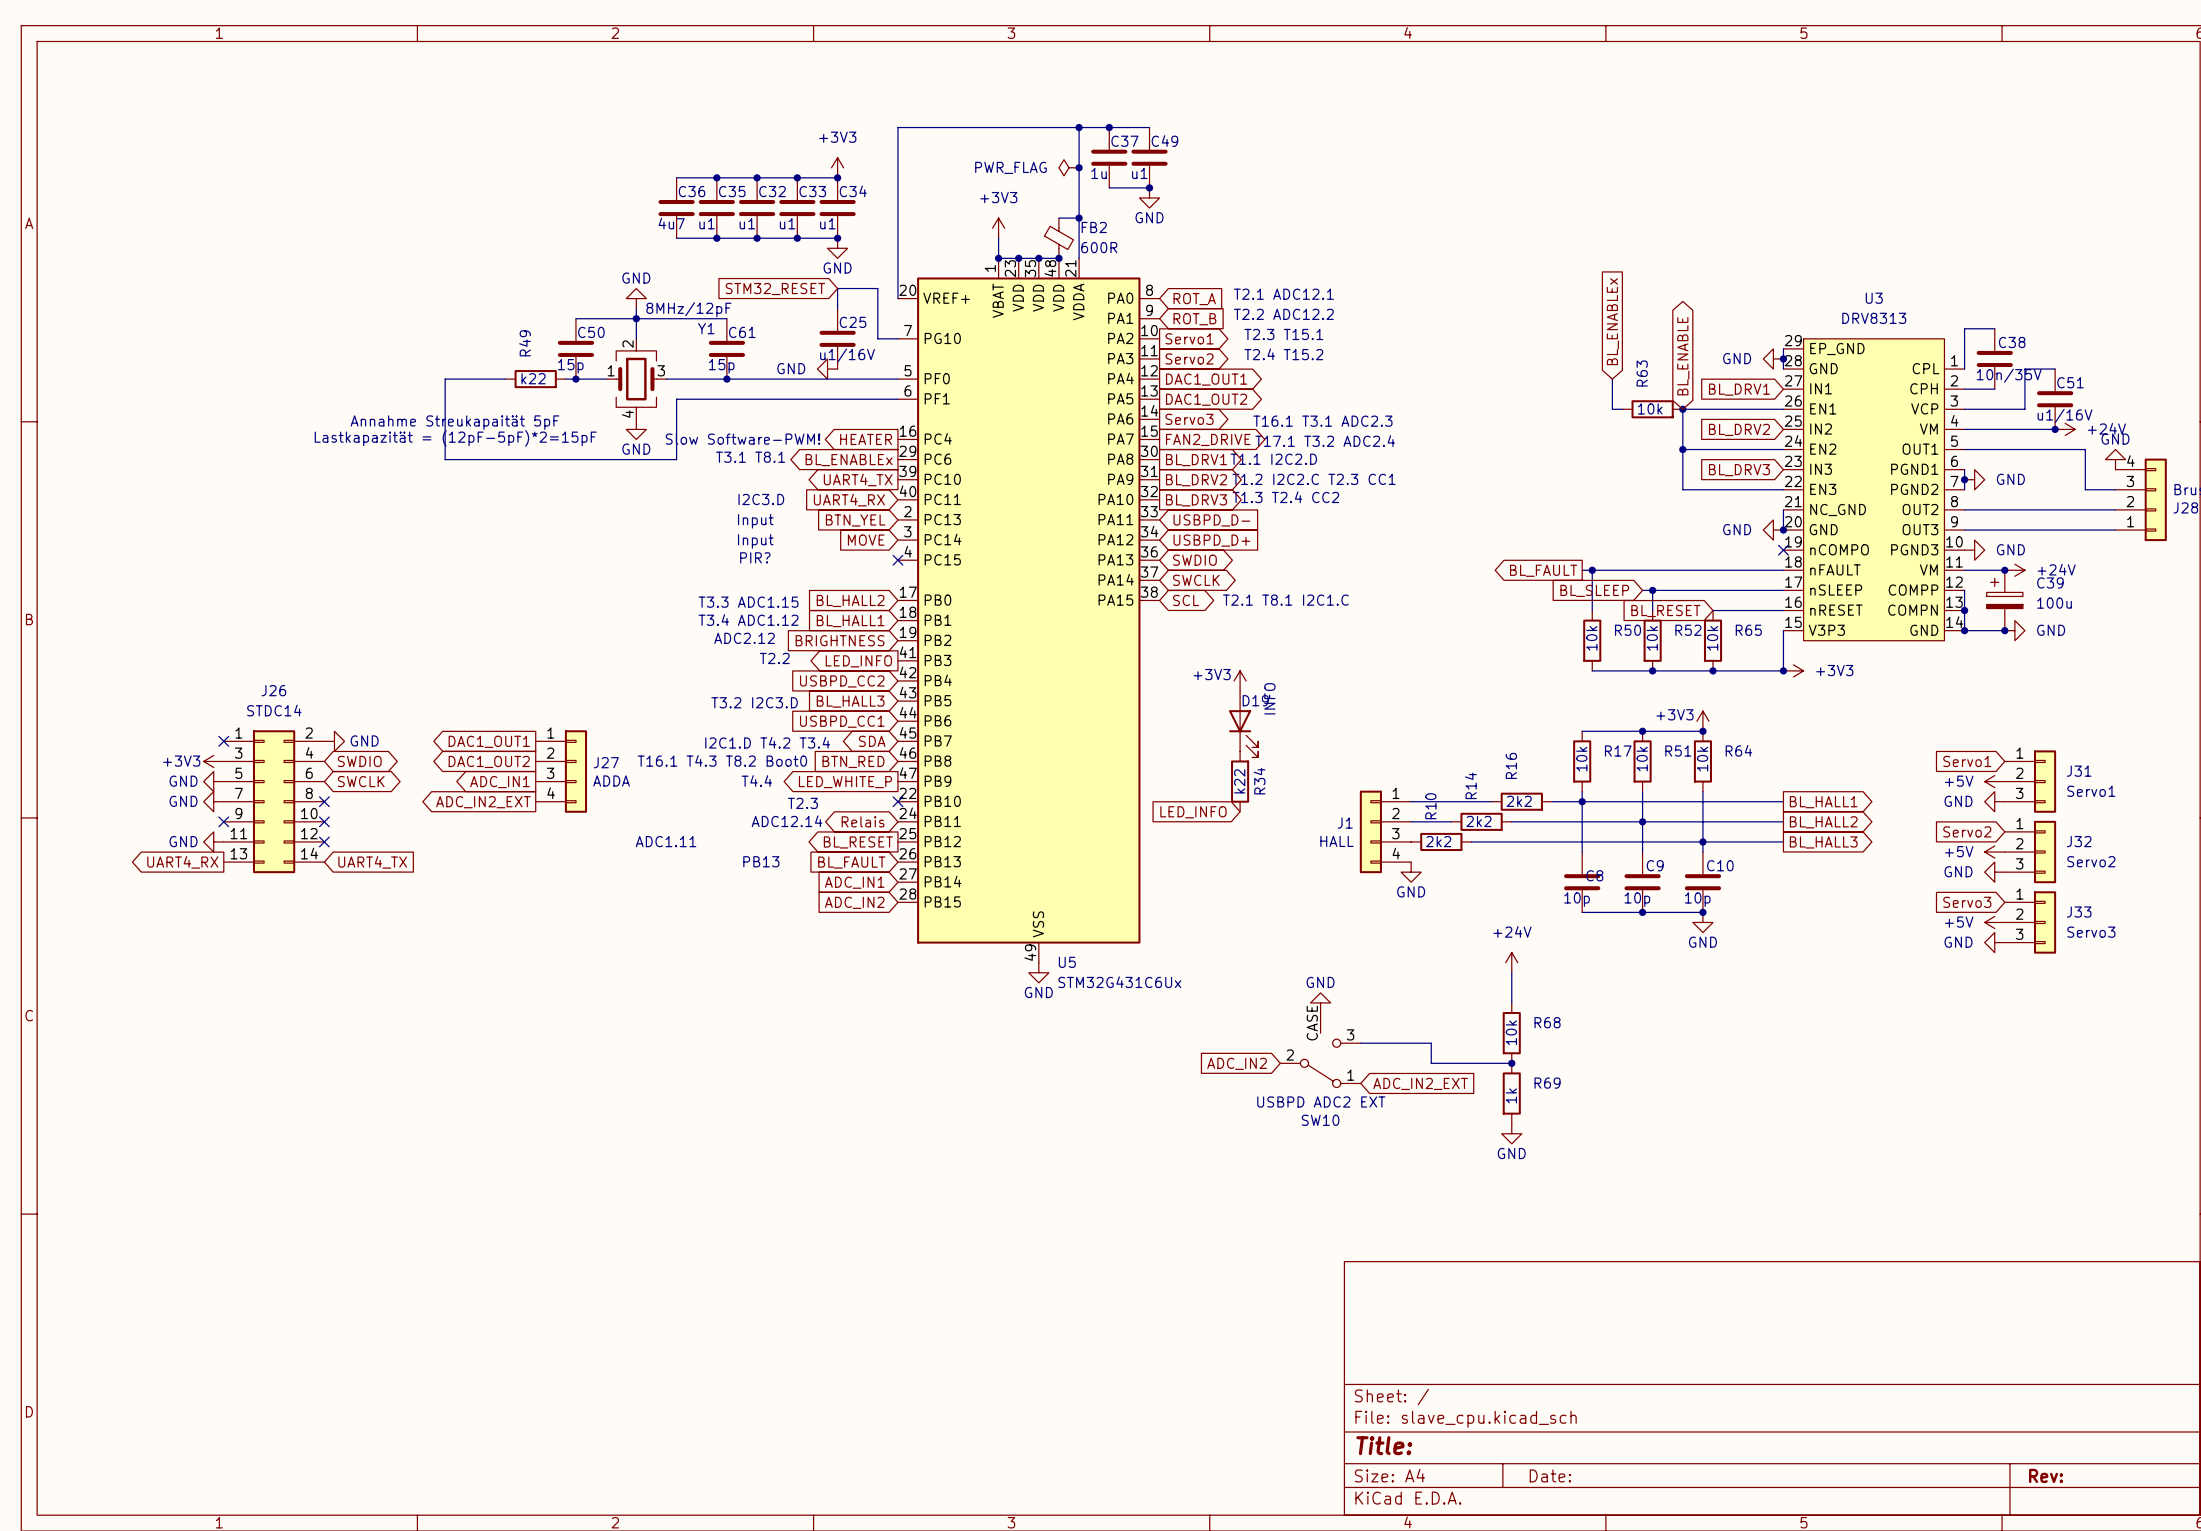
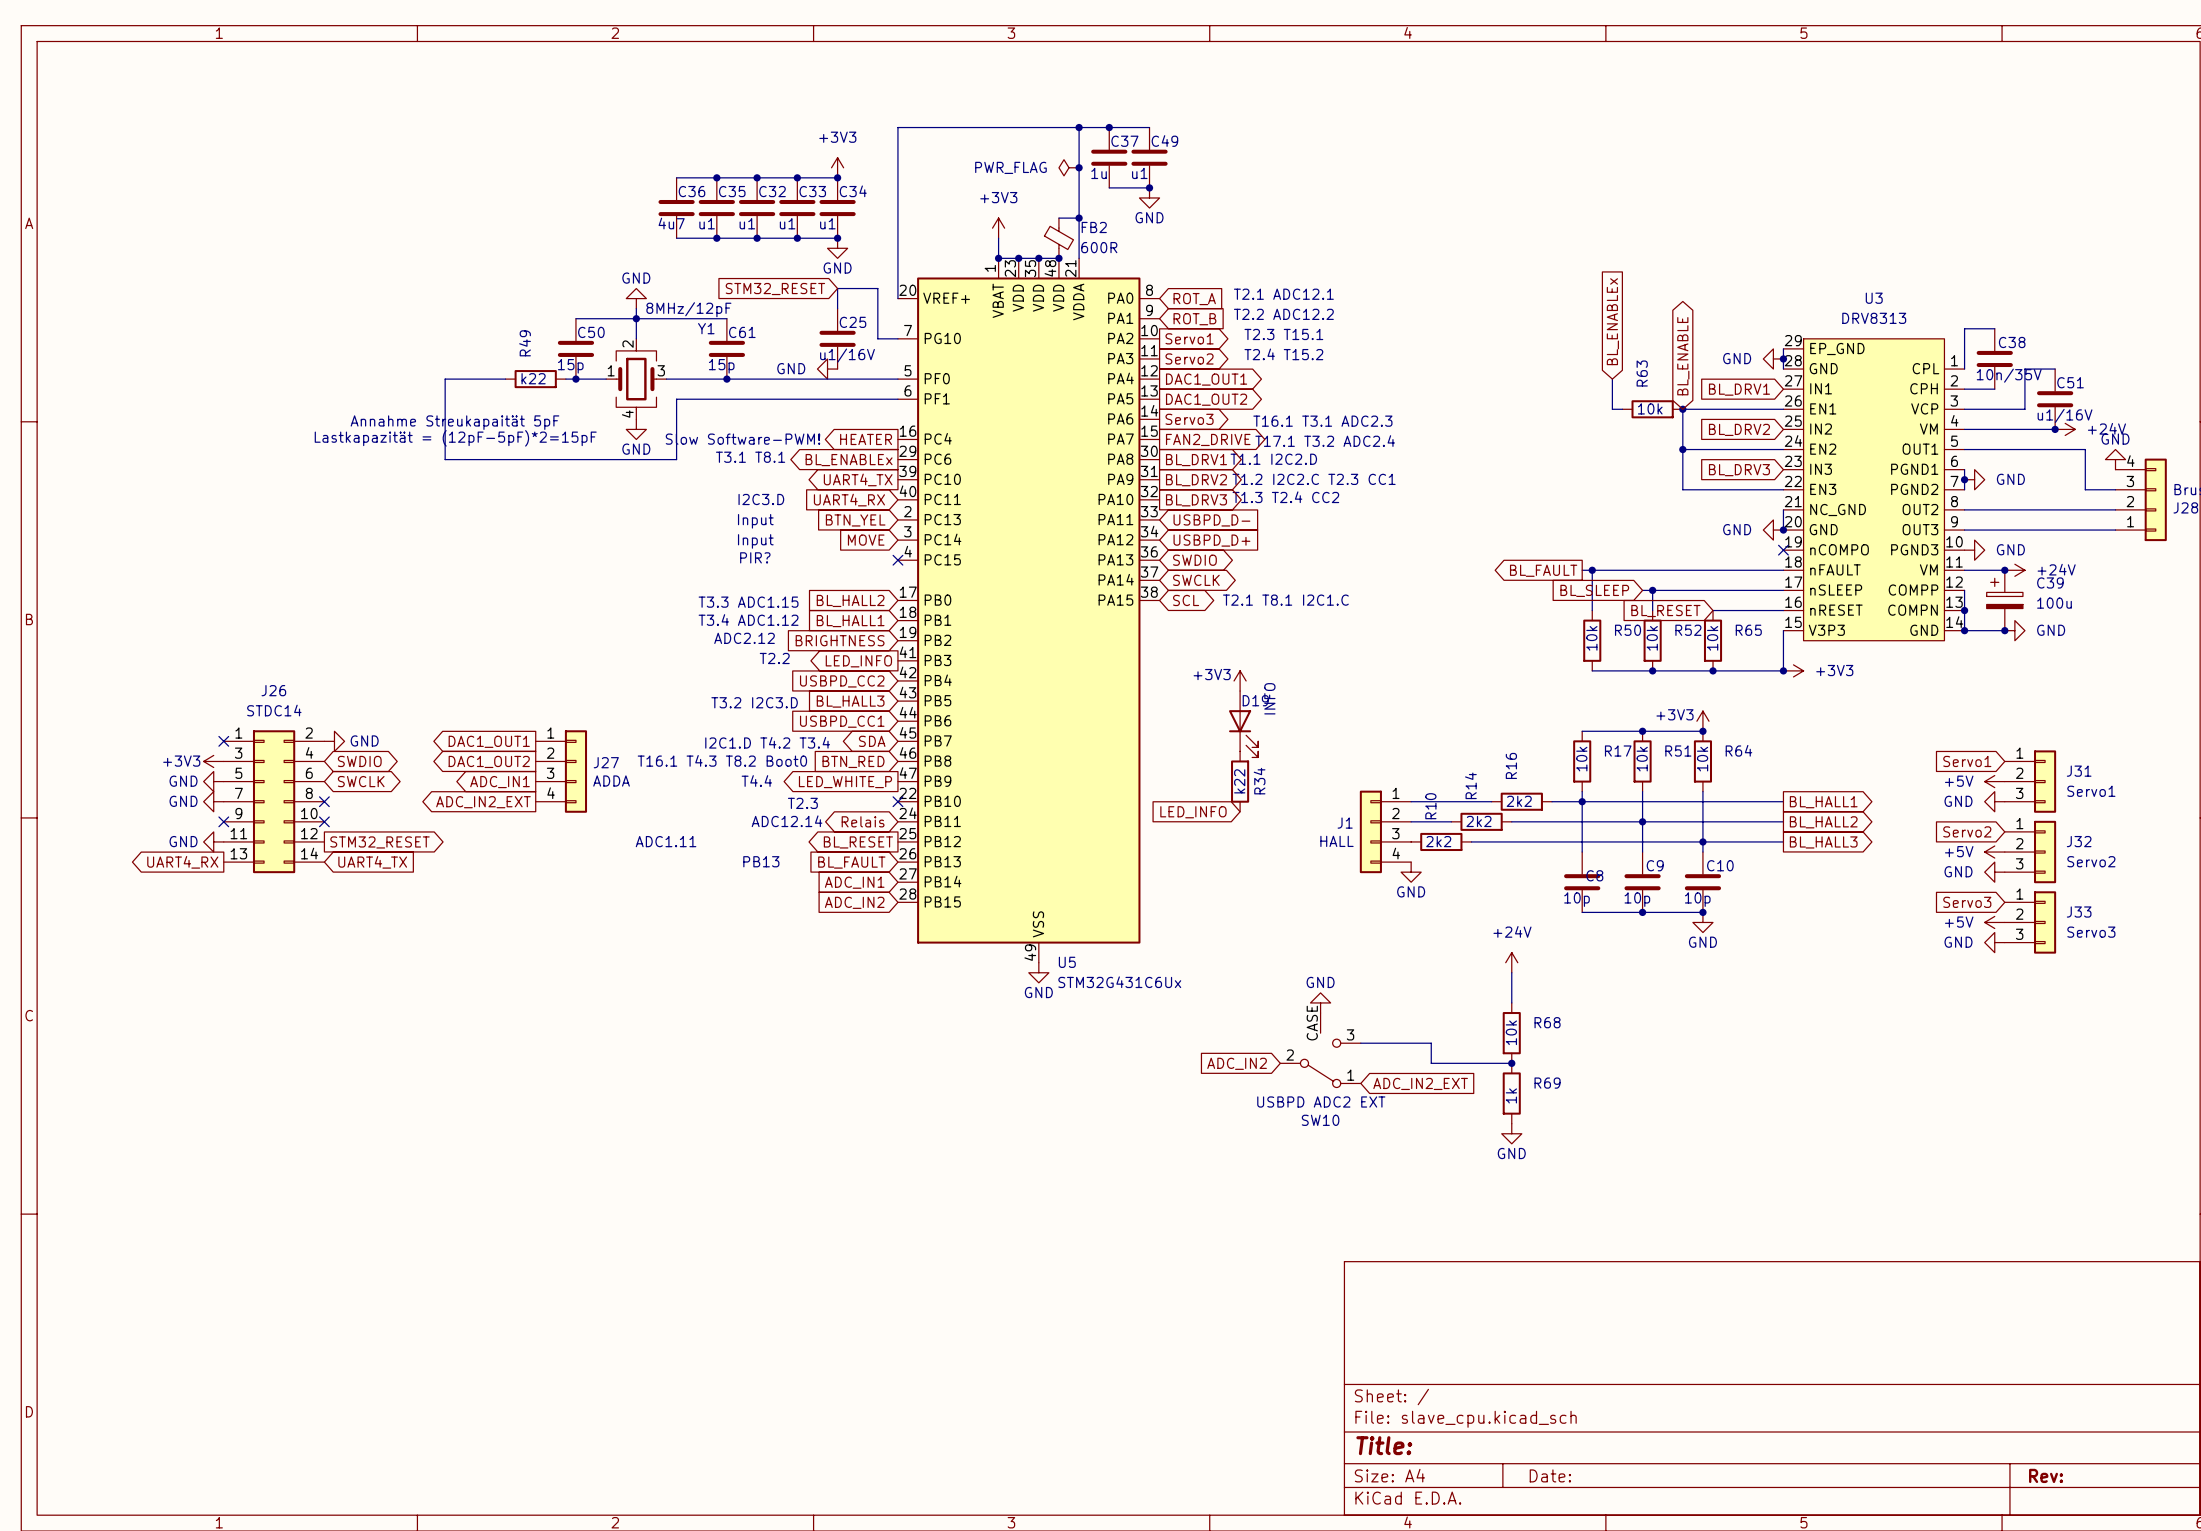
no-connect mark: (324, 841) -> none
global label: none -> STM32_RESET (380, 842)

